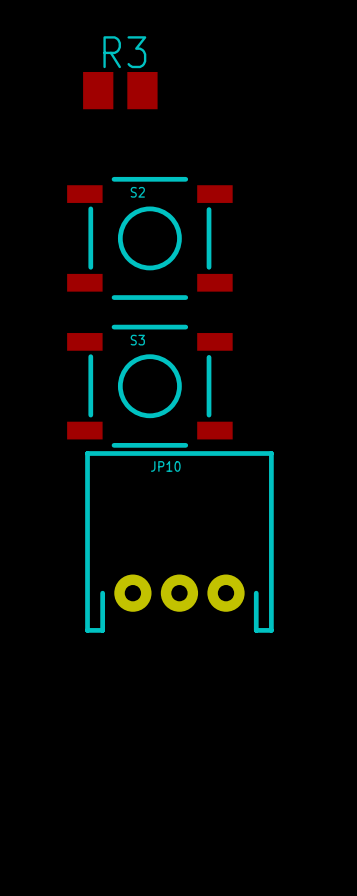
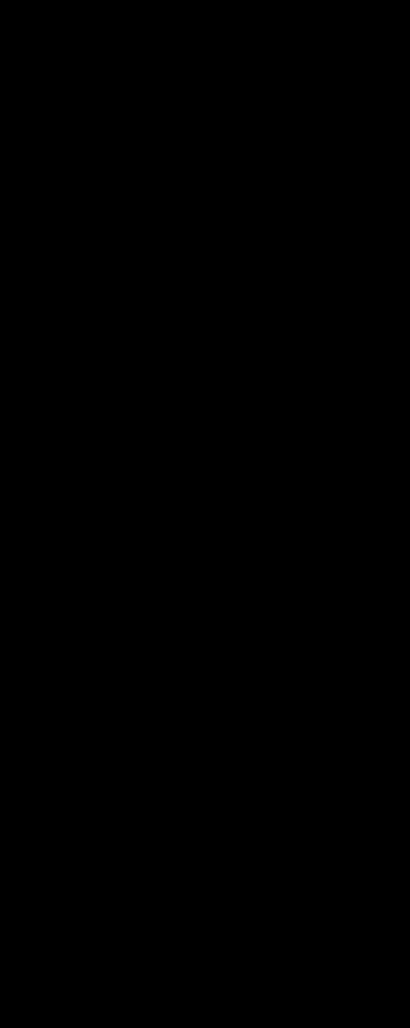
R3: (120, 90) -> none
S2: (149, 238) -> none
S3: (149, 386) -> none
JP10: (179, 541) -> none

